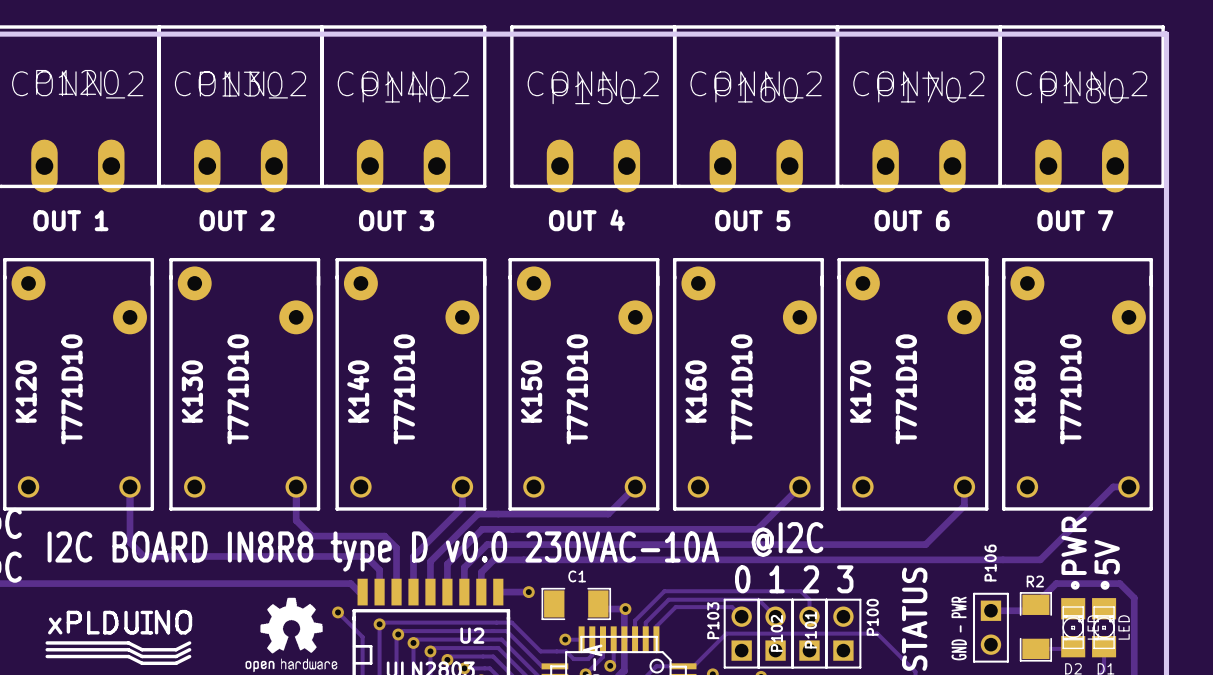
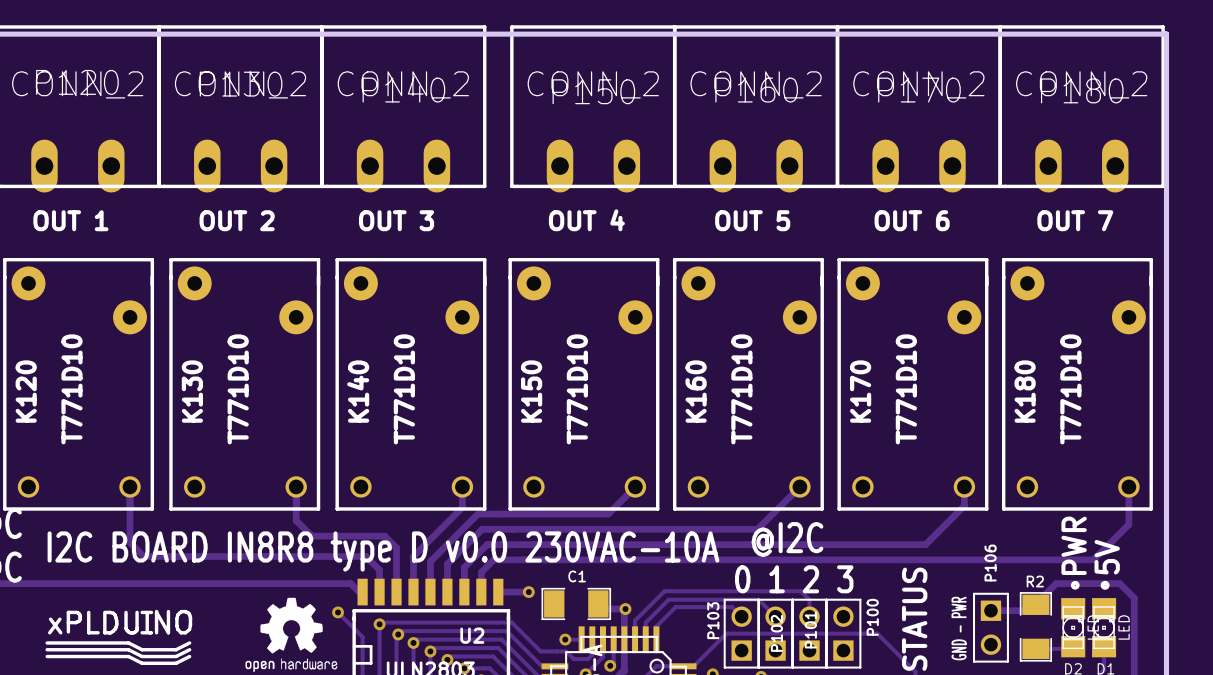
track: (1128, 486) (1113, 486) (1040, 559) -> (1128, 486) (1128, 524) (1093, 559) (1040, 559)

